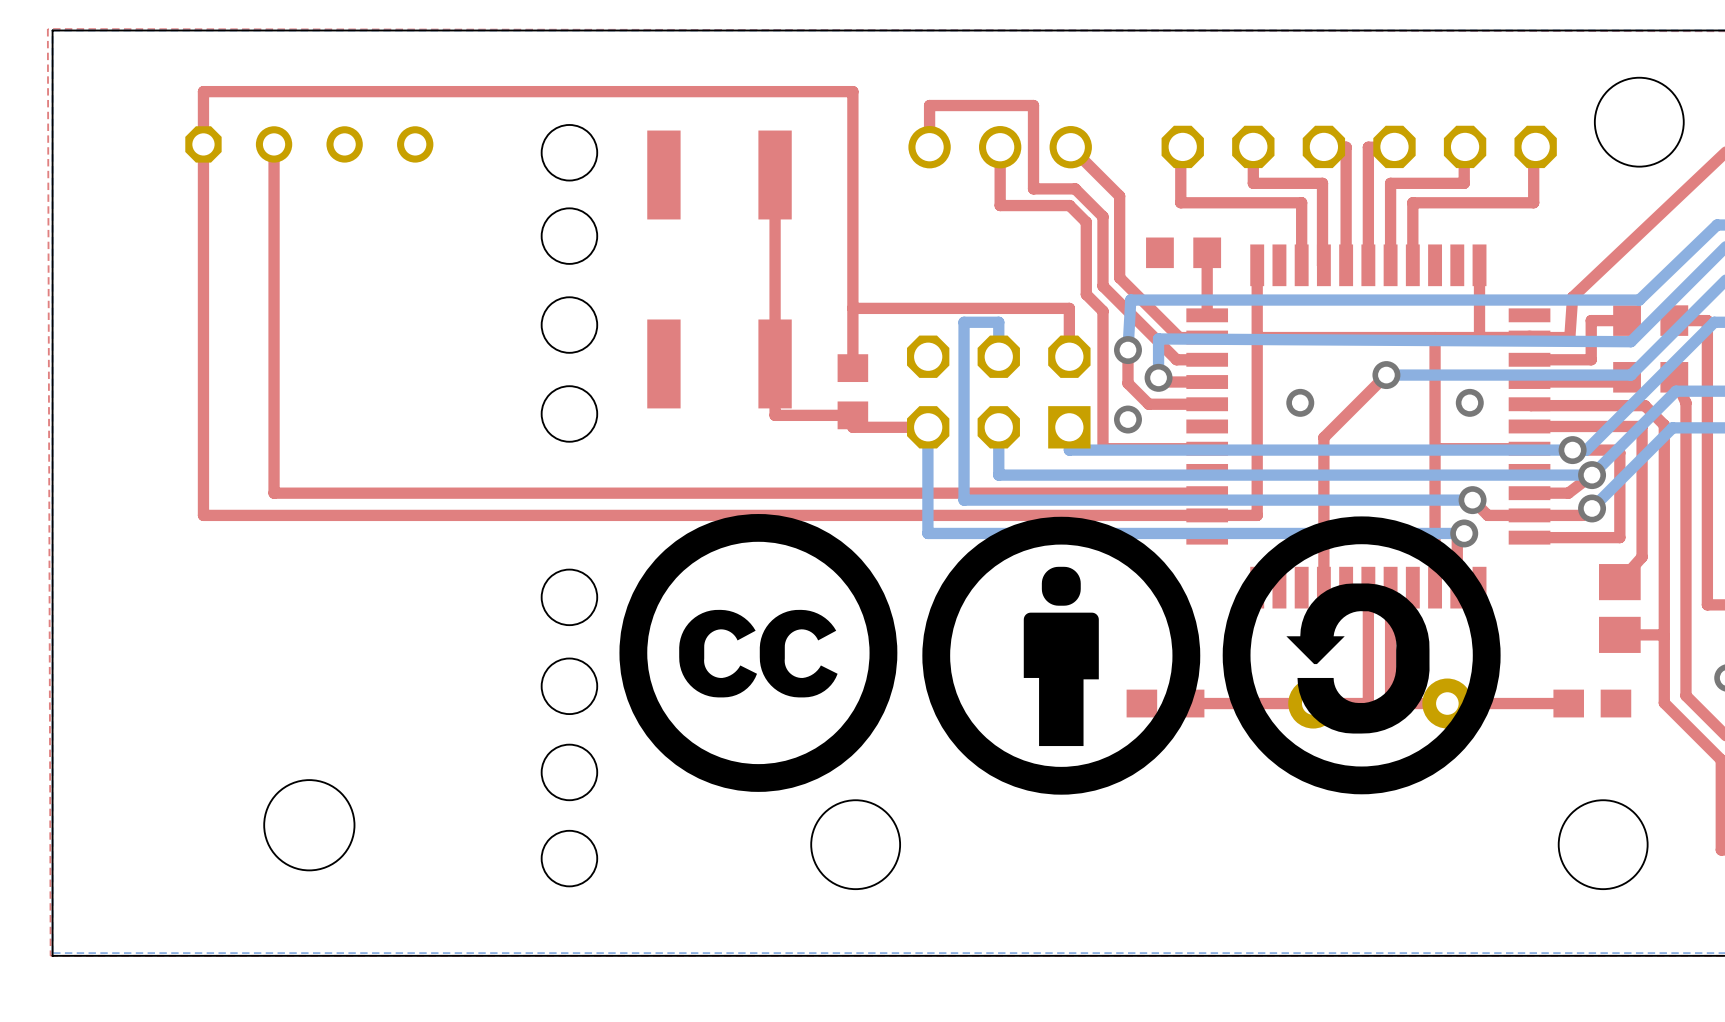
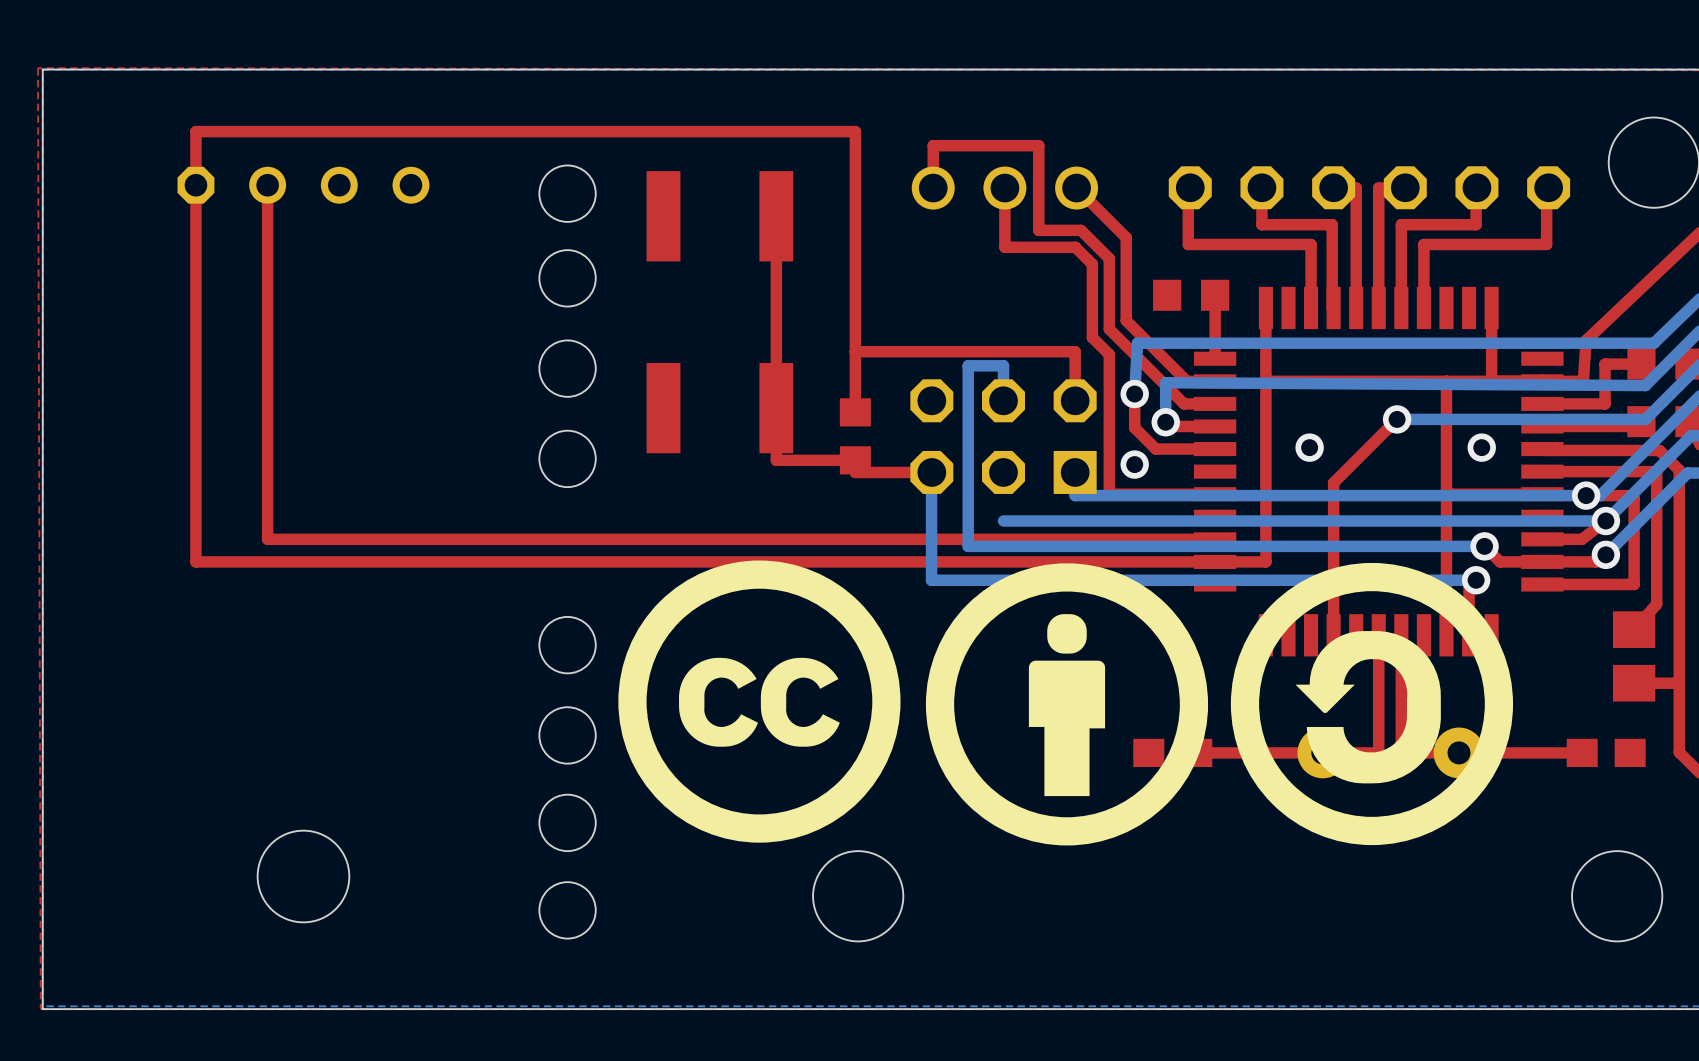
bottom track: (998, 427) (998, 475) -> none

